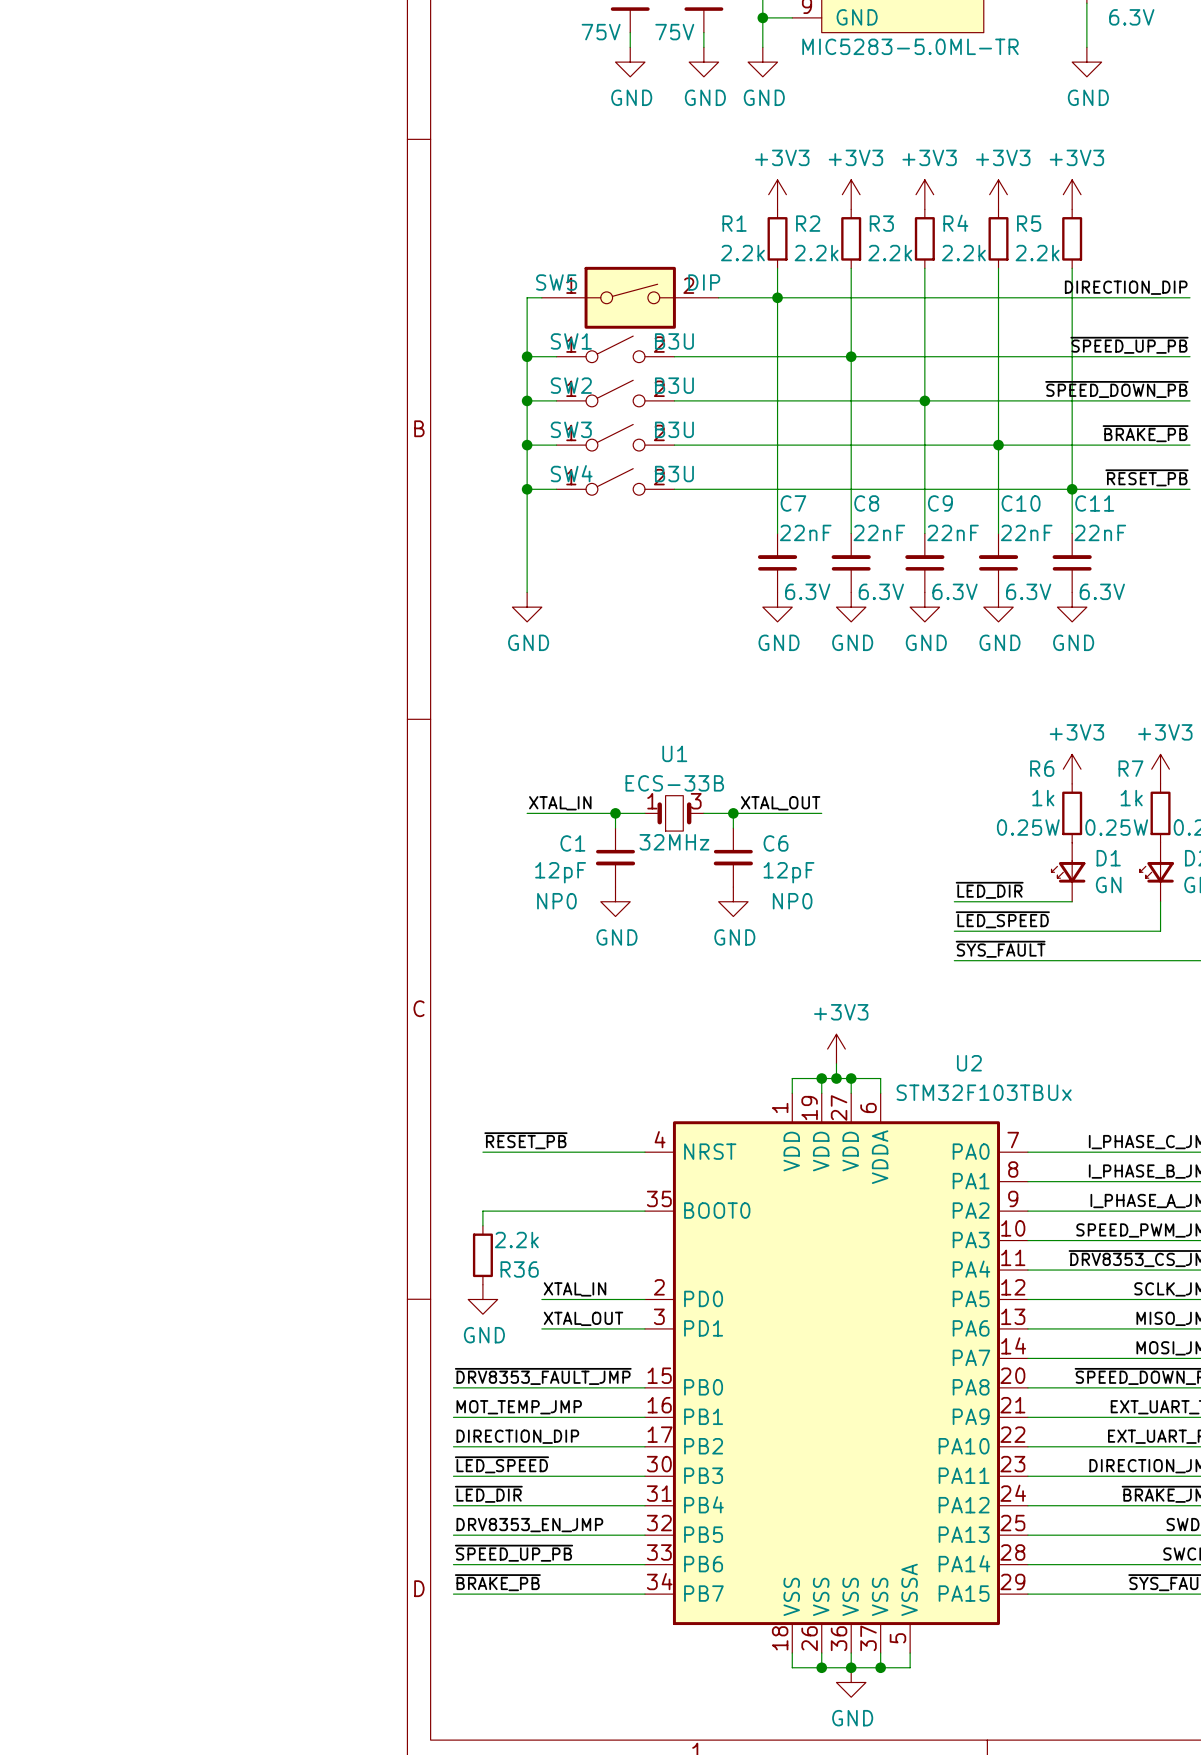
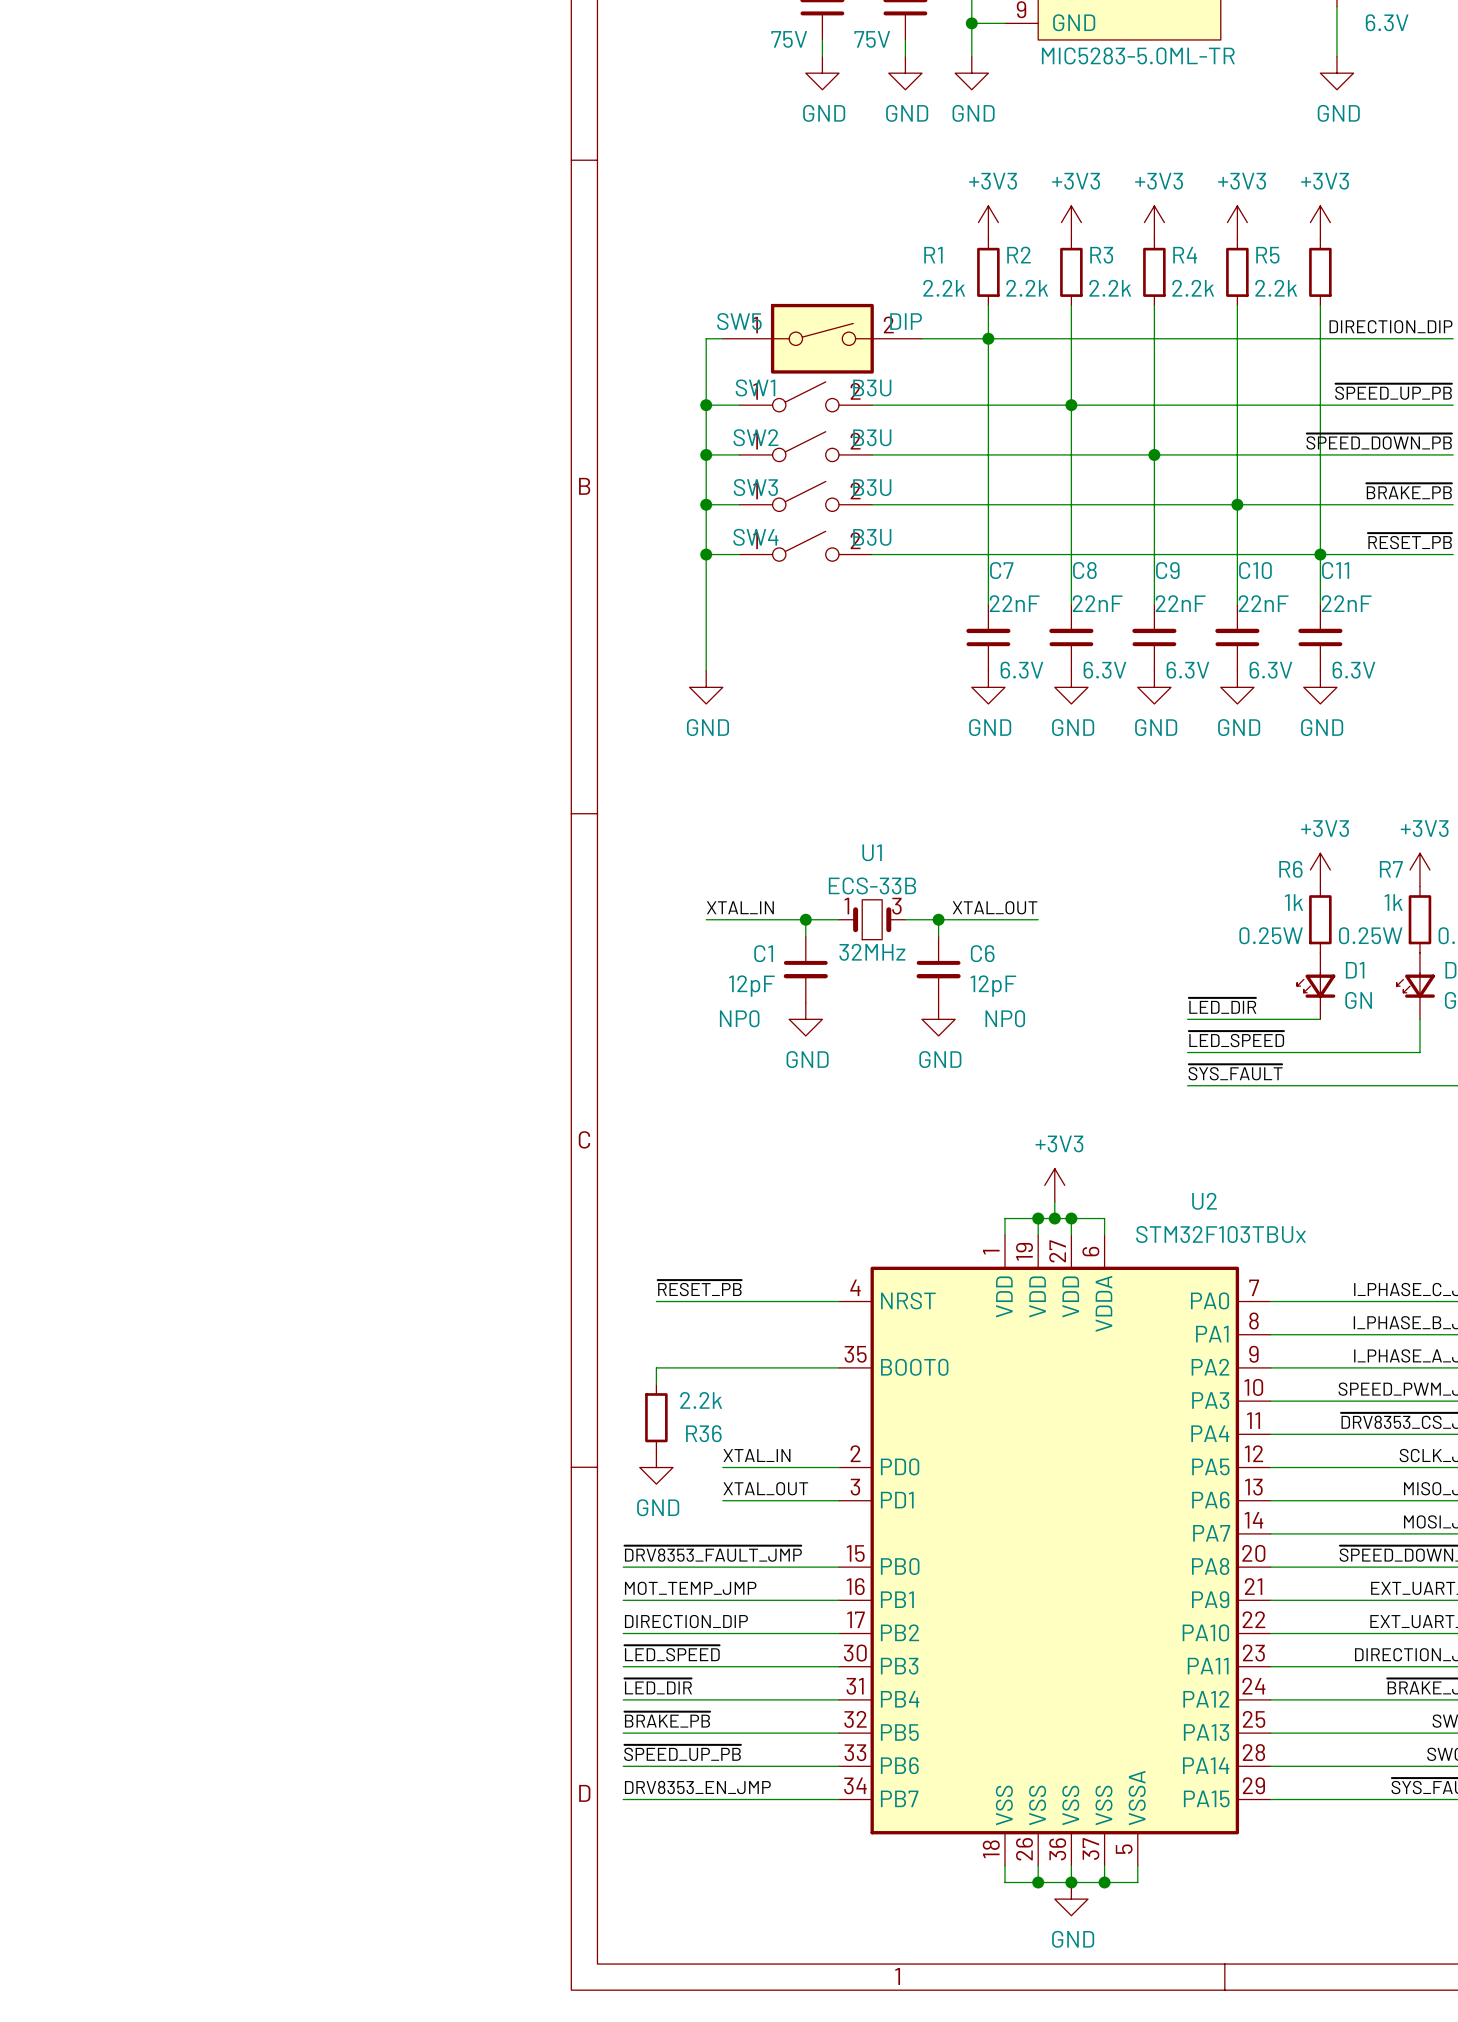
label: DRV8353_EN_JMP (529, 1525) -> ~{BRAKE_PB} (667, 1719)
label: ~{BRAKE_PB} (497, 1582) -> DRV8353_EN_JMP (697, 1787)

